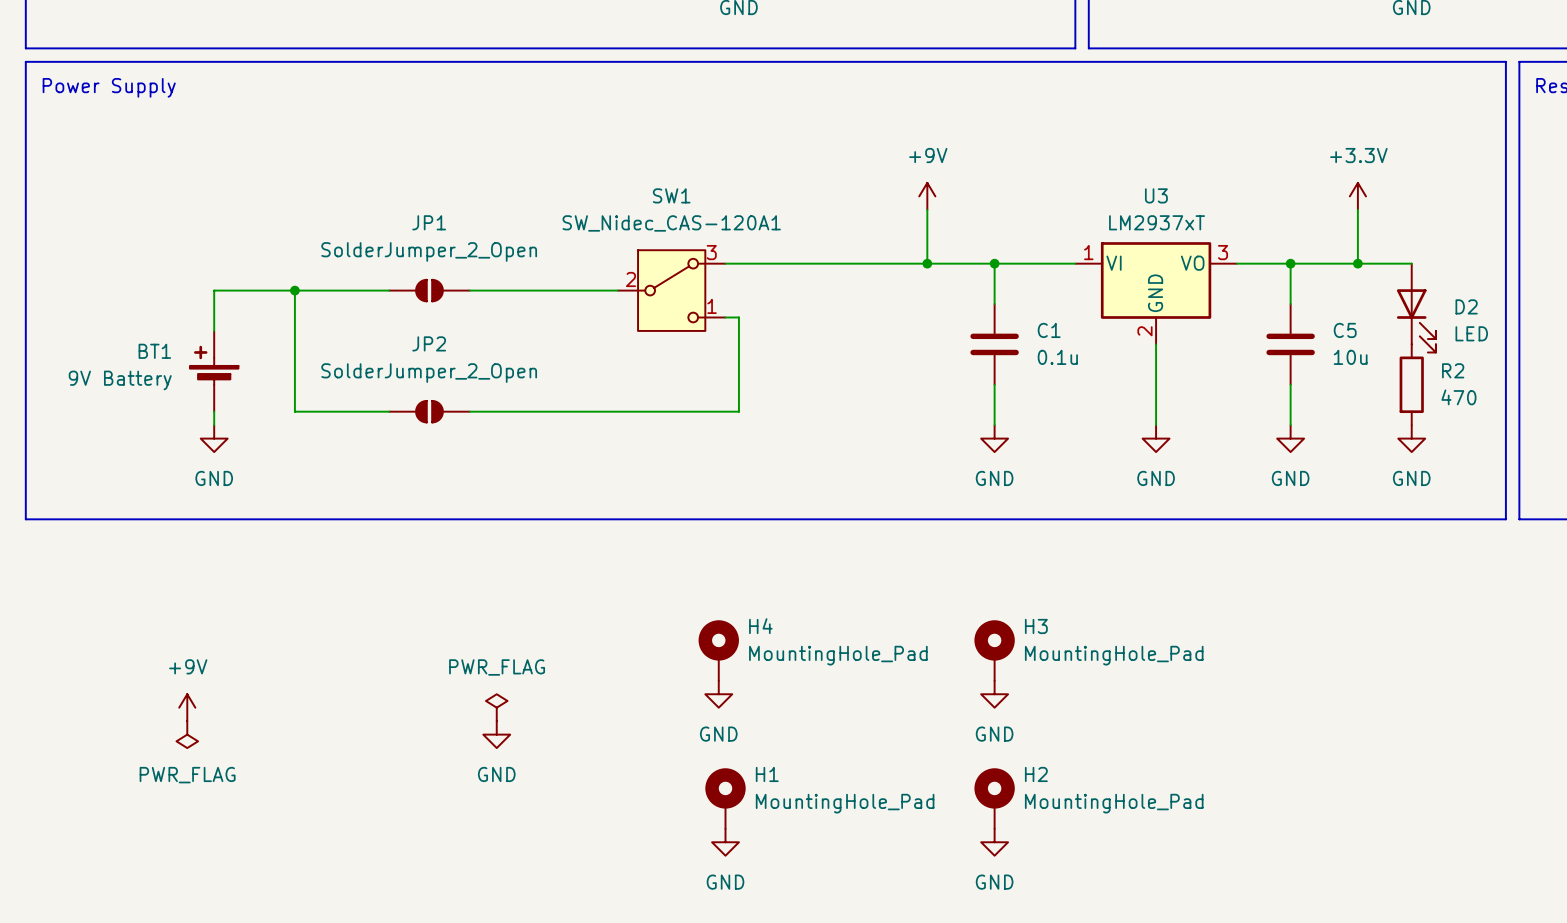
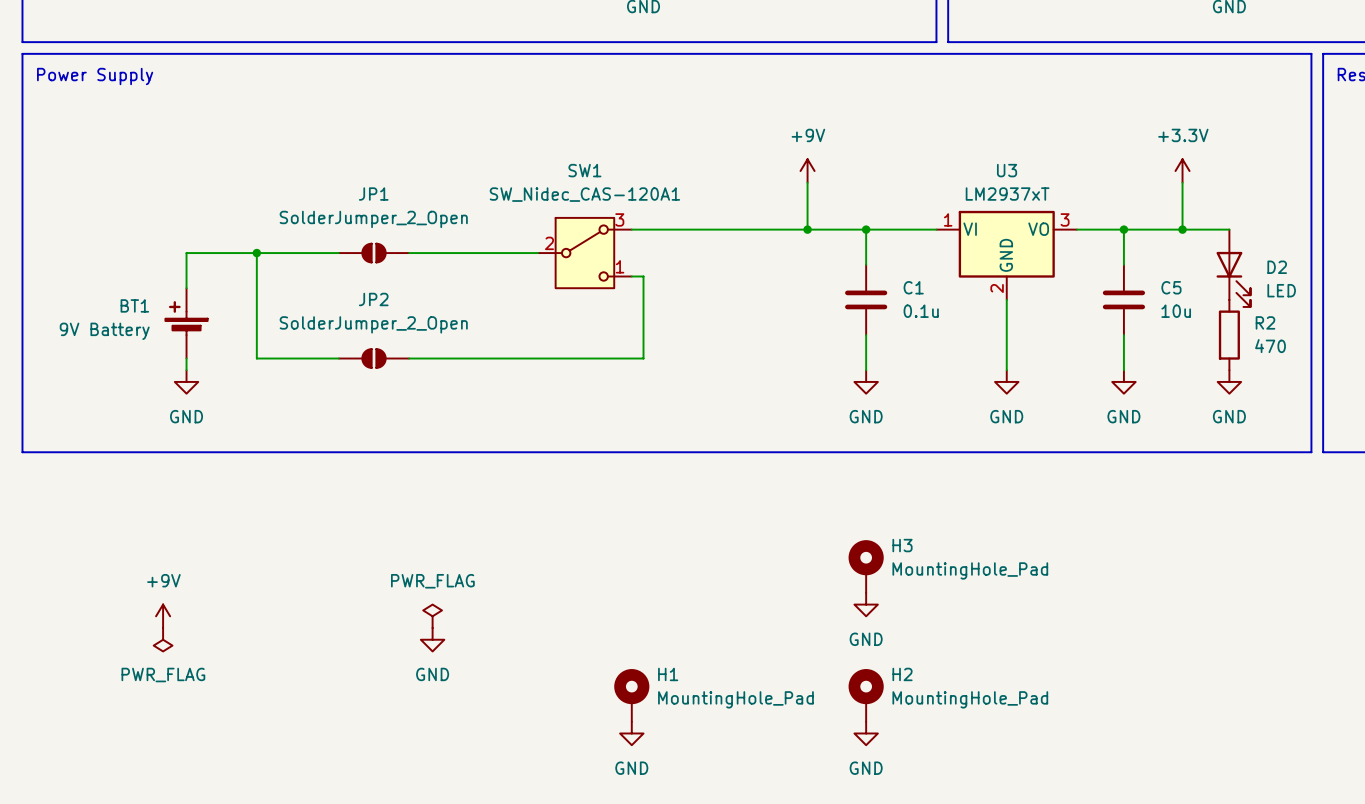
H4: MountingHole_Pad (718, 650) -> none
power symbol: GND (718, 694) -> none

